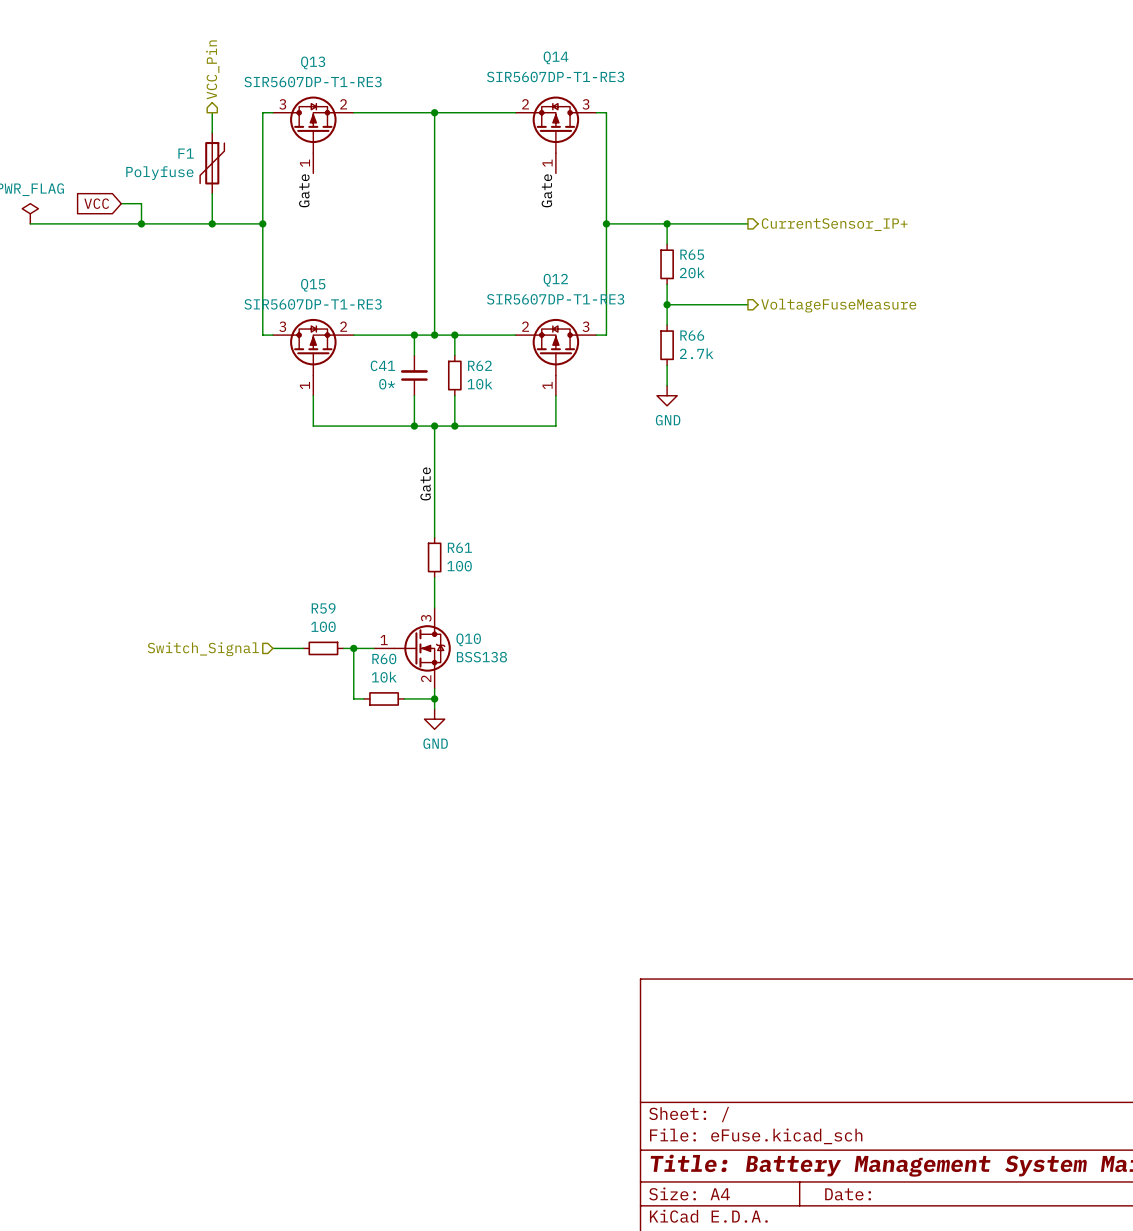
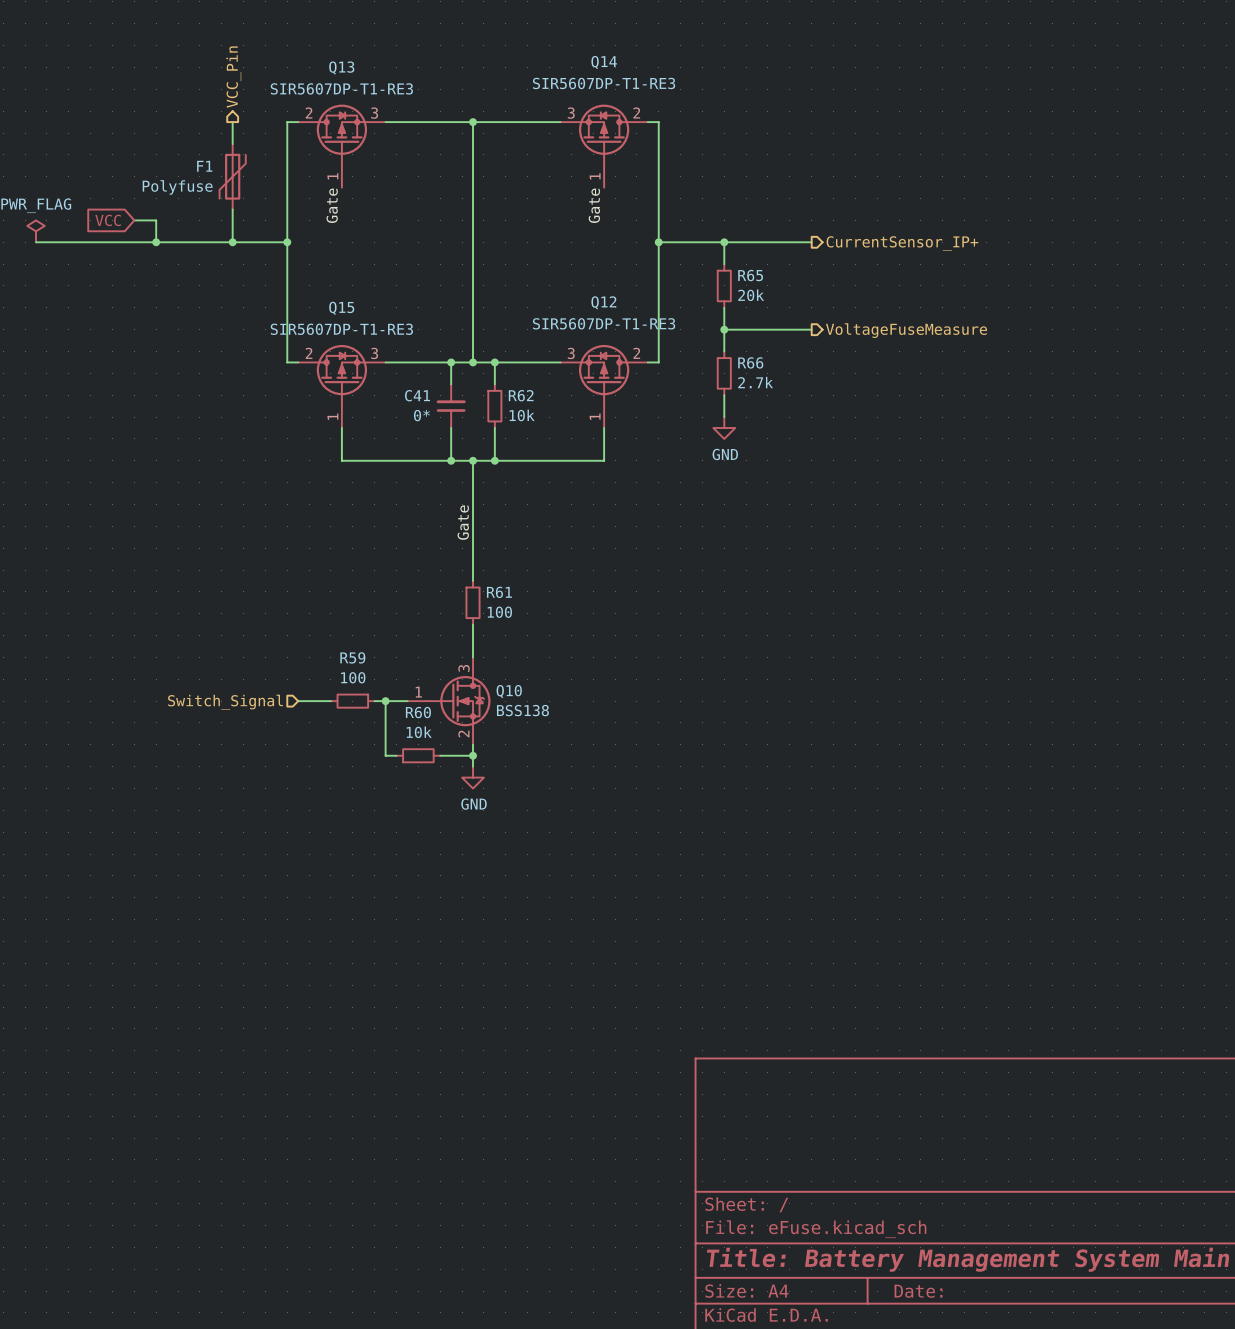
Q13 pin number: 3 (282, 104) -> 2 (309, 112)
Q13 pin number: 2 (343, 104) -> 3 (374, 113)
Q14 pin number: 2 (525, 104) -> 3 (571, 113)
Q14 pin number: 3 (585, 104) -> 2 (636, 112)
Q15 pin number: 3 (282, 326) -> 2 (309, 353)
Q15 pin number: 2 (343, 326) -> 3 (374, 353)
Q12 pin number: 2 (525, 326) -> 3 (571, 353)
Q12 pin number: 3 (585, 326) -> 2 (636, 353)

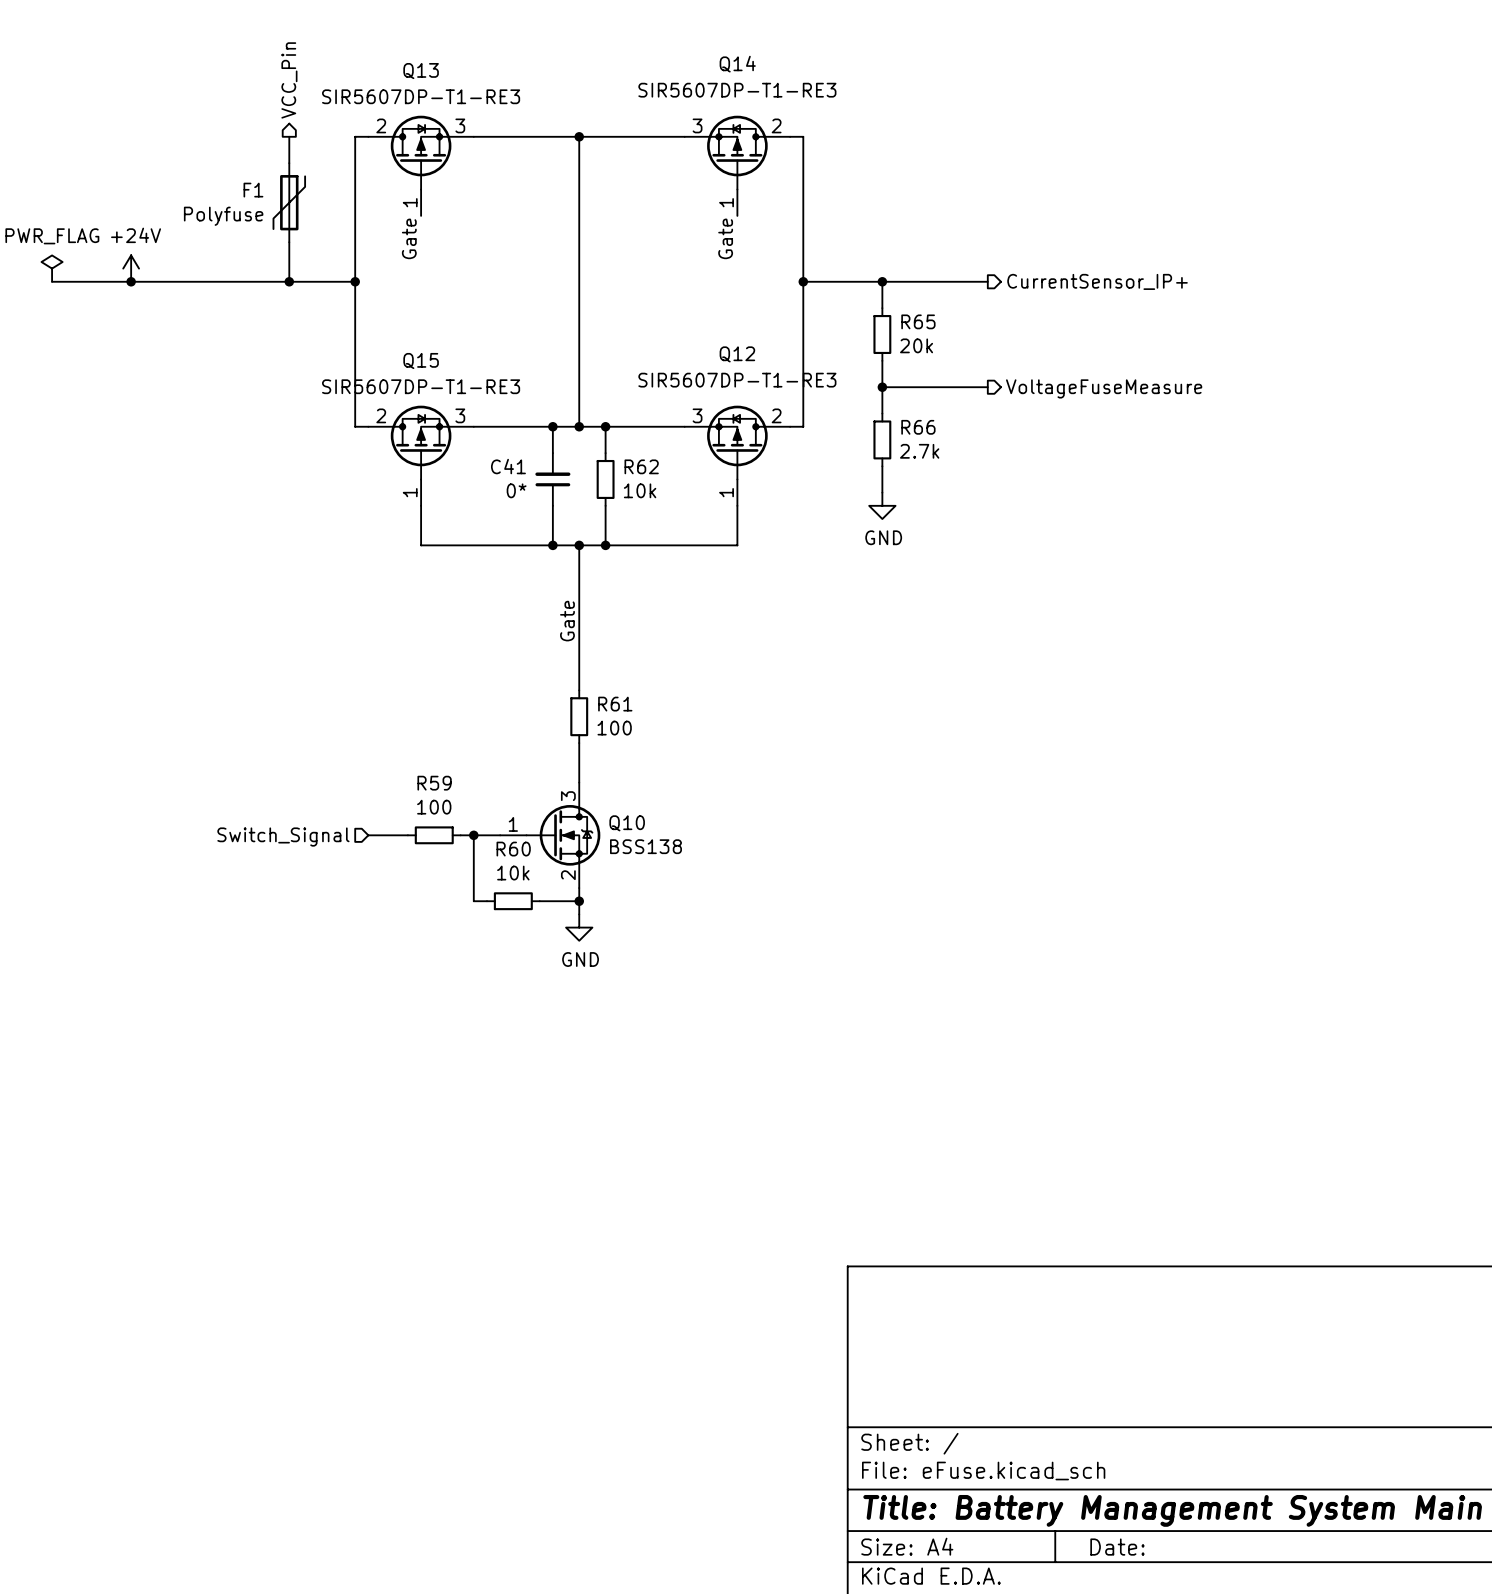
global label: VCC (108, 220) -> none
wire: (134, 220) (156, 220) (156, 242) -> none
power symbol: none -> +24V (131, 268)
junction: none -> (131, 281)
junction: (156, 242) -> none

